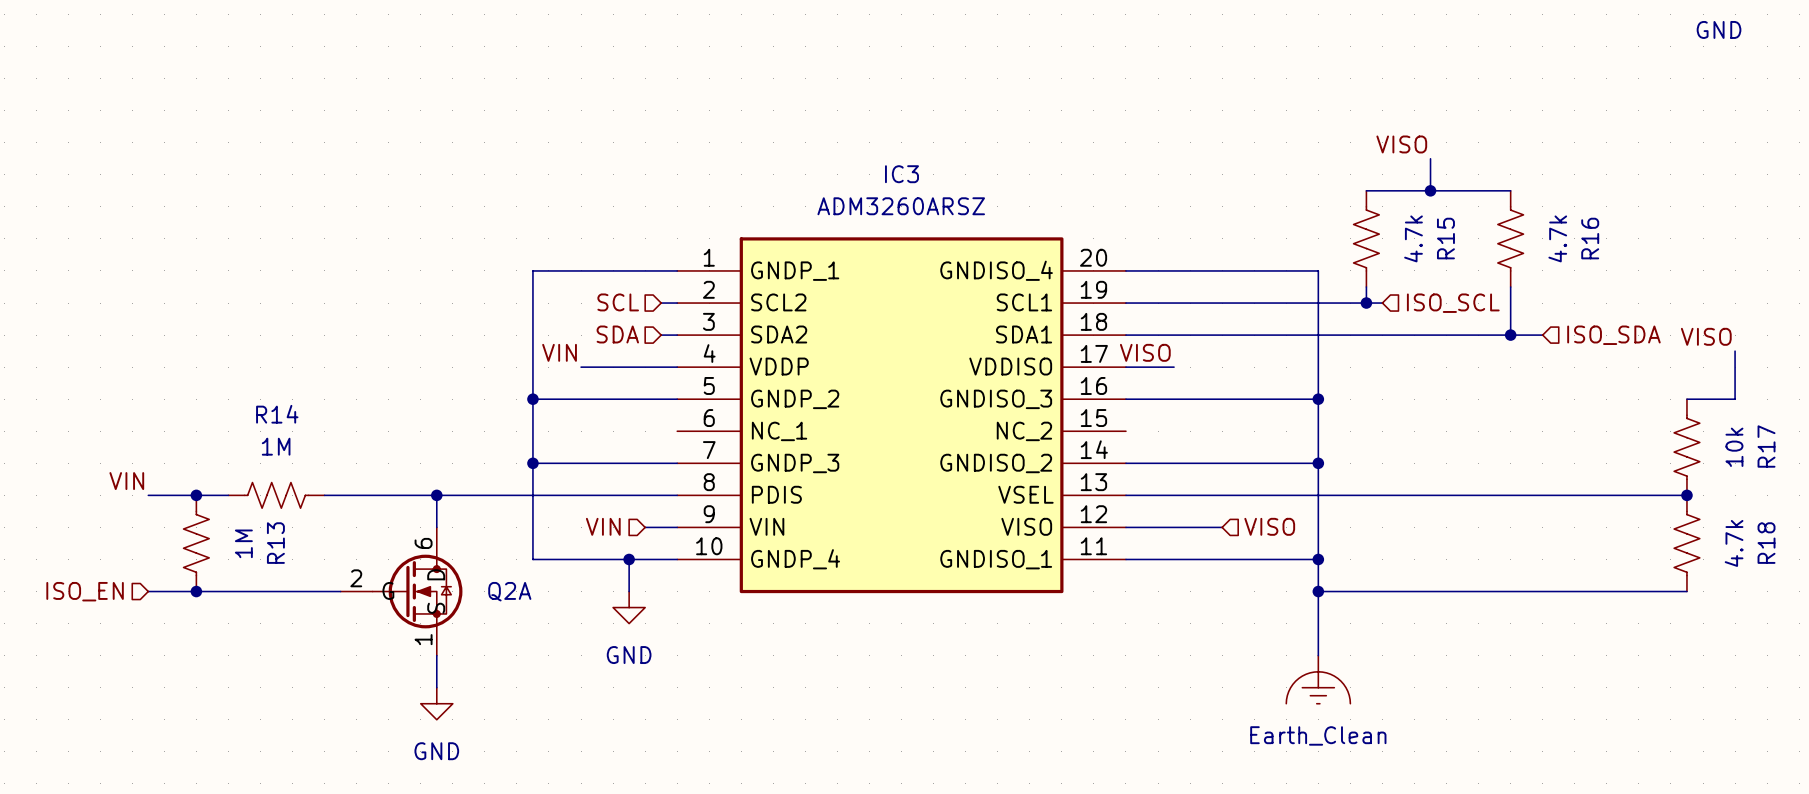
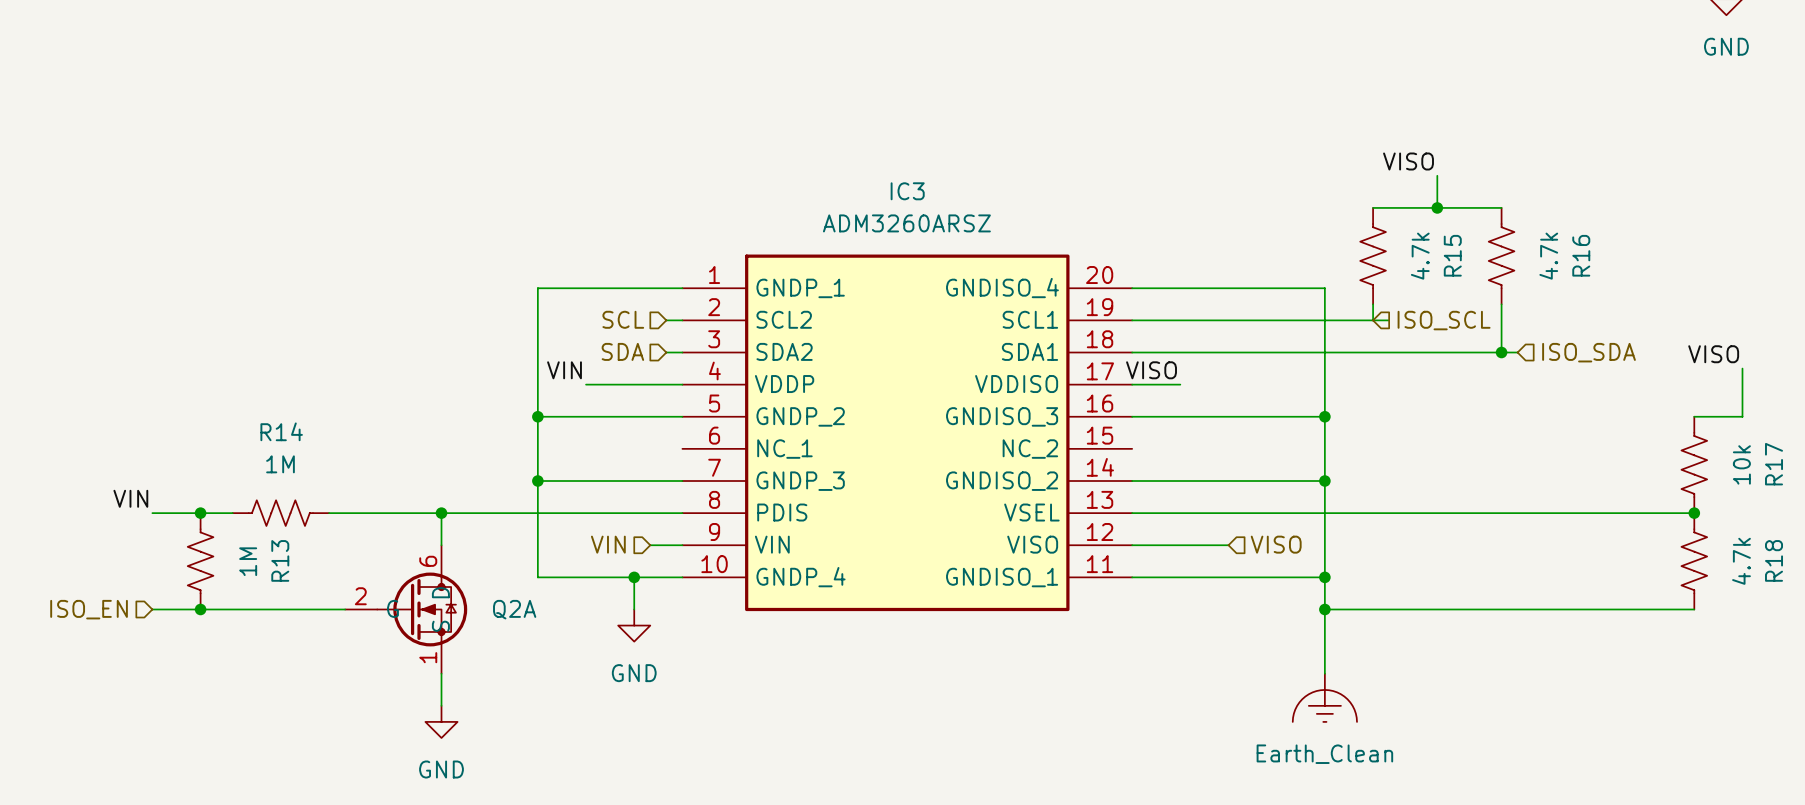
wire: (1494, 190) (1510, 190) -> none
R16 position: (1510, 238) -> (1501, 256)
wire: none -> (1501, 304) (1501, 352)
wire: (1510, 287) (1510, 335) (1542, 335) -> none
junction: (1366, 303) -> none
hierarchical label position: ISO_SCL (1453, 303) -> ISO_SCL (1444, 320)
junction position: (1510, 335) -> (1501, 352)
hierarchical label position: ISO_SDA (1613, 335) -> ISO_SDA (1589, 352)

